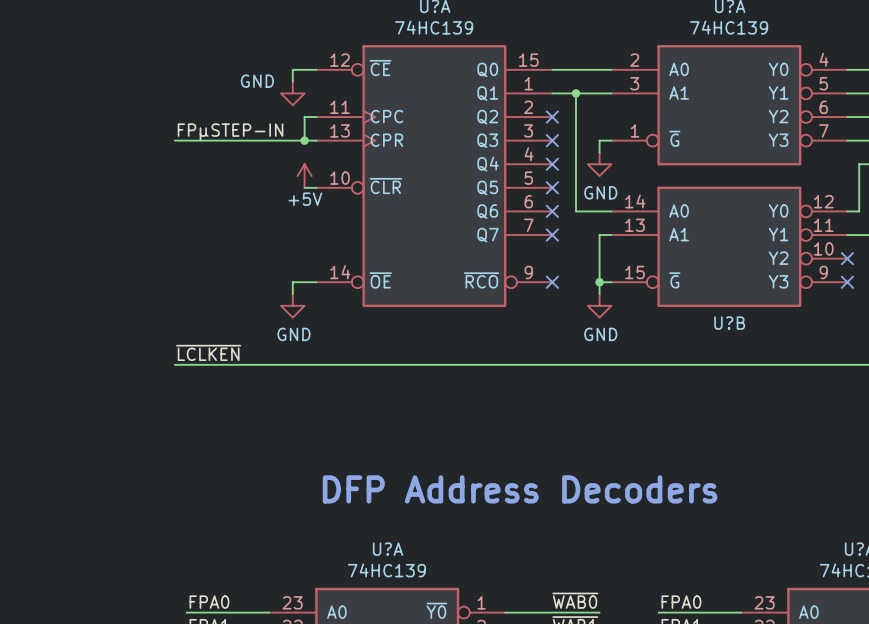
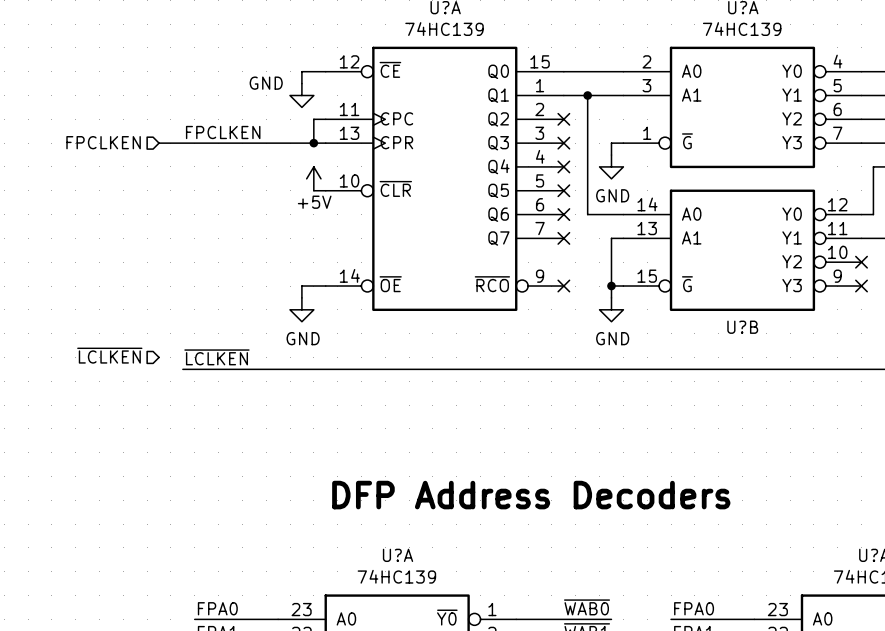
label: FPµSTEP-IN (230, 132) -> FPCLKEN (223, 132)
hierarchical label: none -> FPCLKEN (103, 142)
wire: none -> (159, 143) (182, 143)
hierarchical label: none -> ~{LCLKEN} (109, 355)

